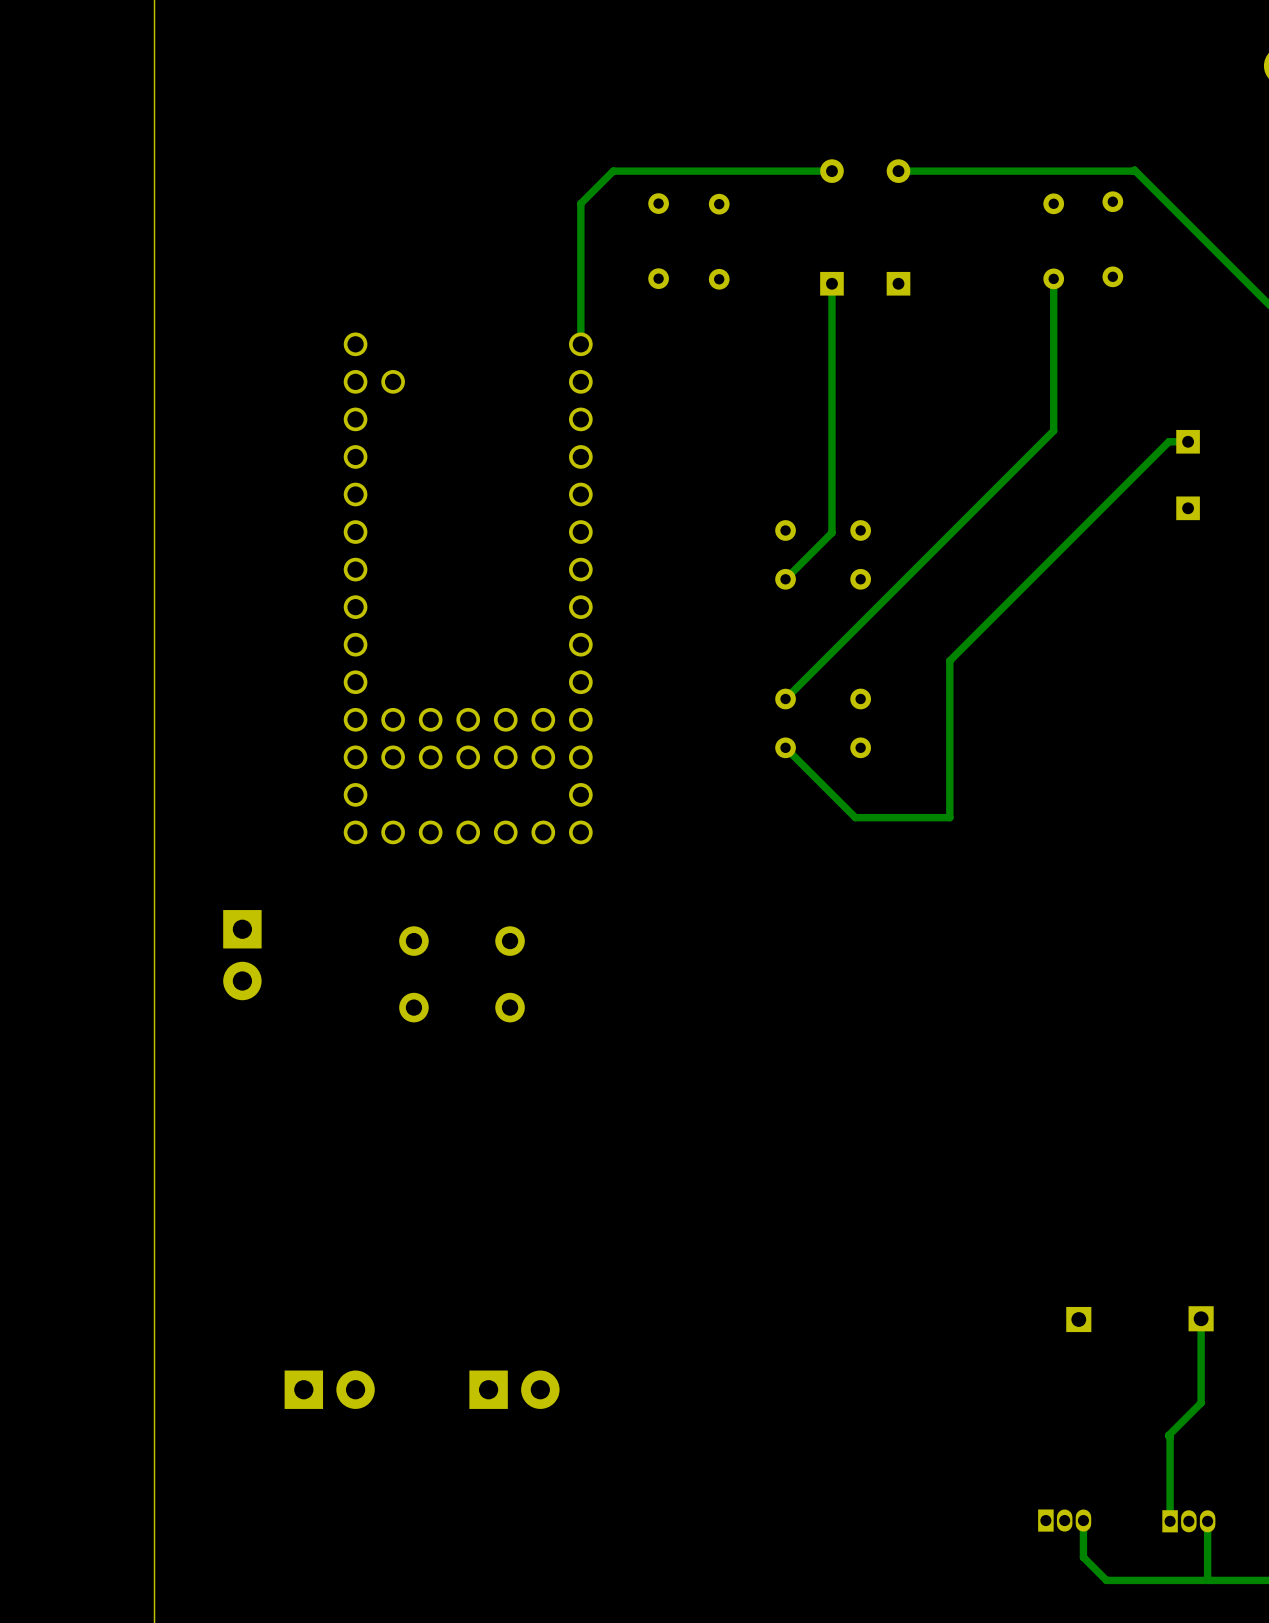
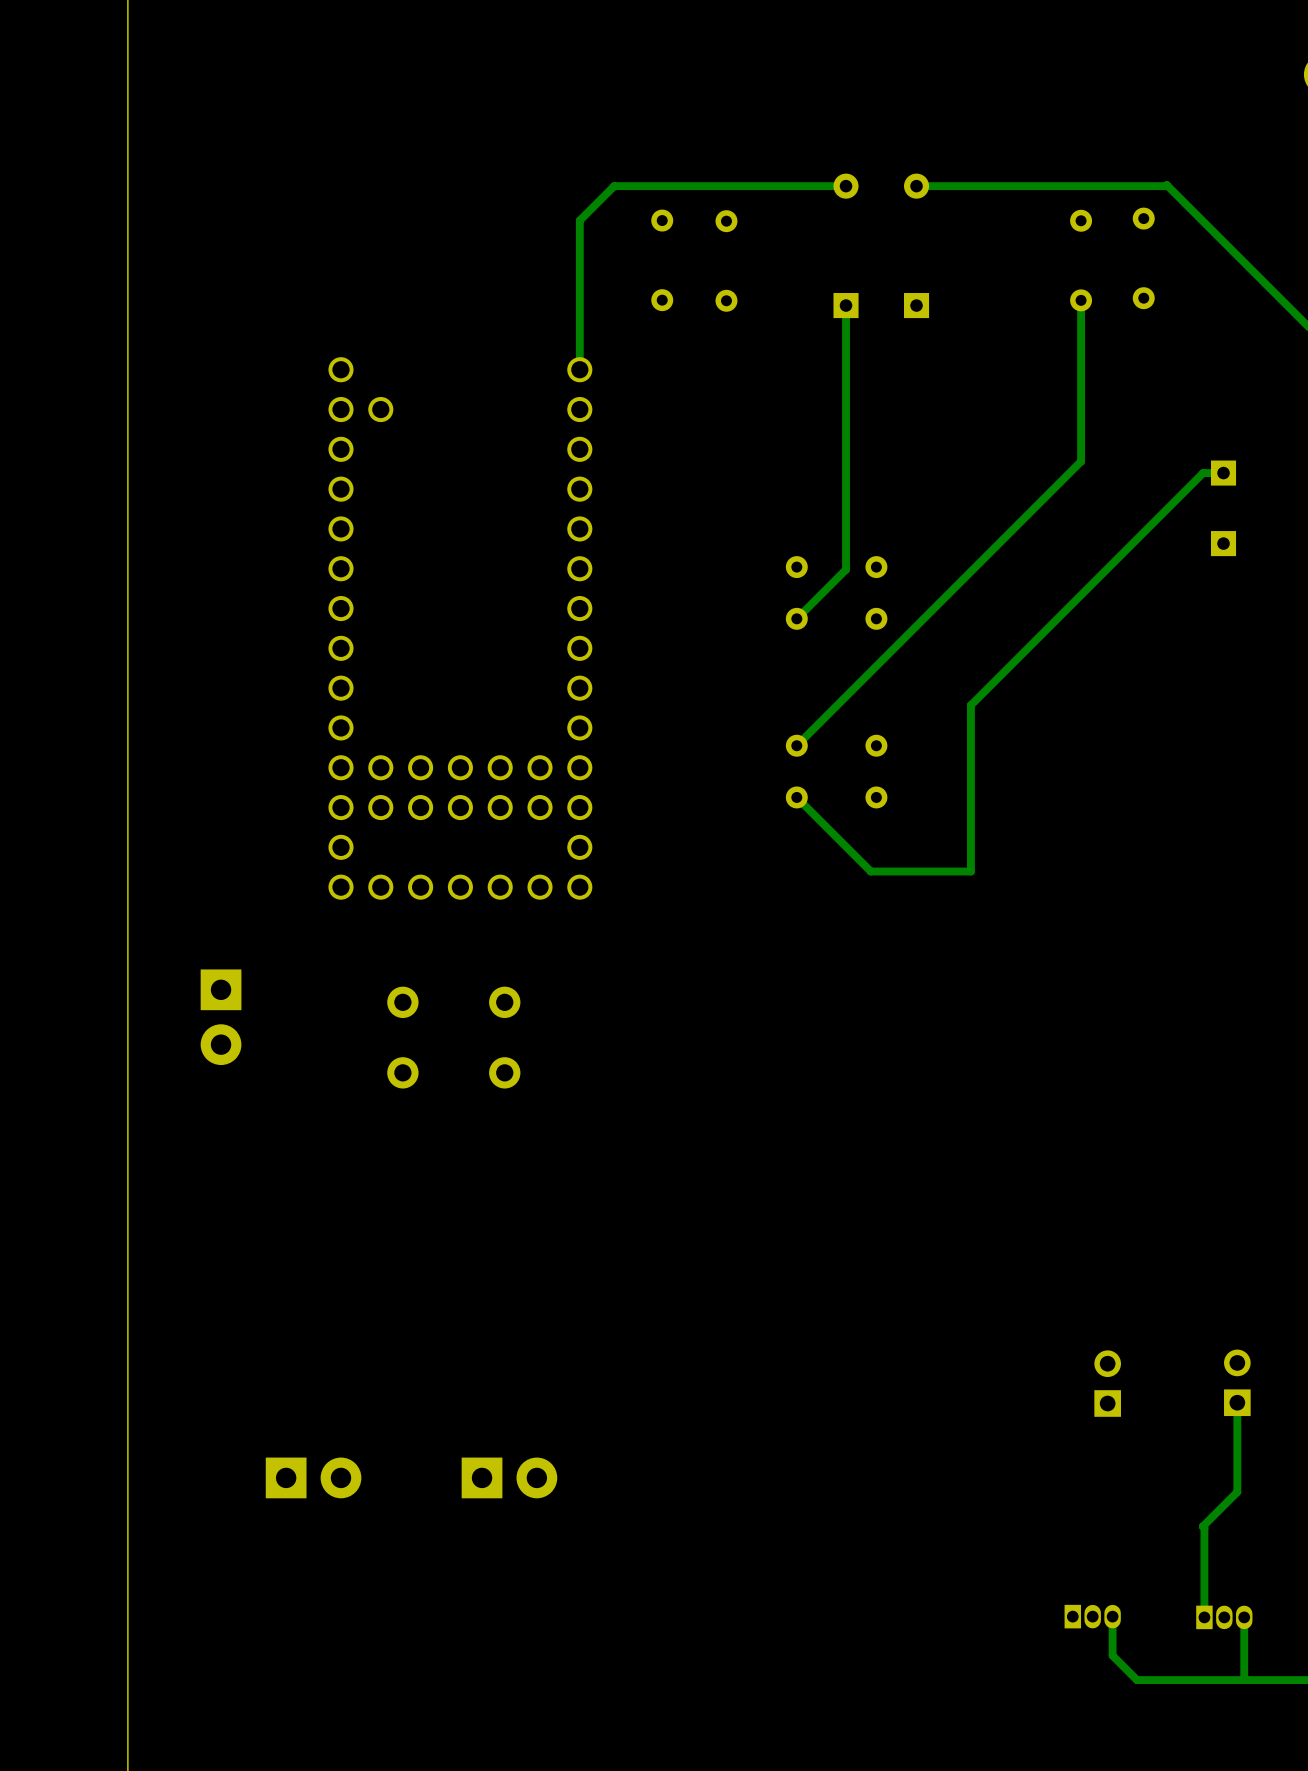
part: none -> (1107, 1383)
part: none -> (1237, 1382)

